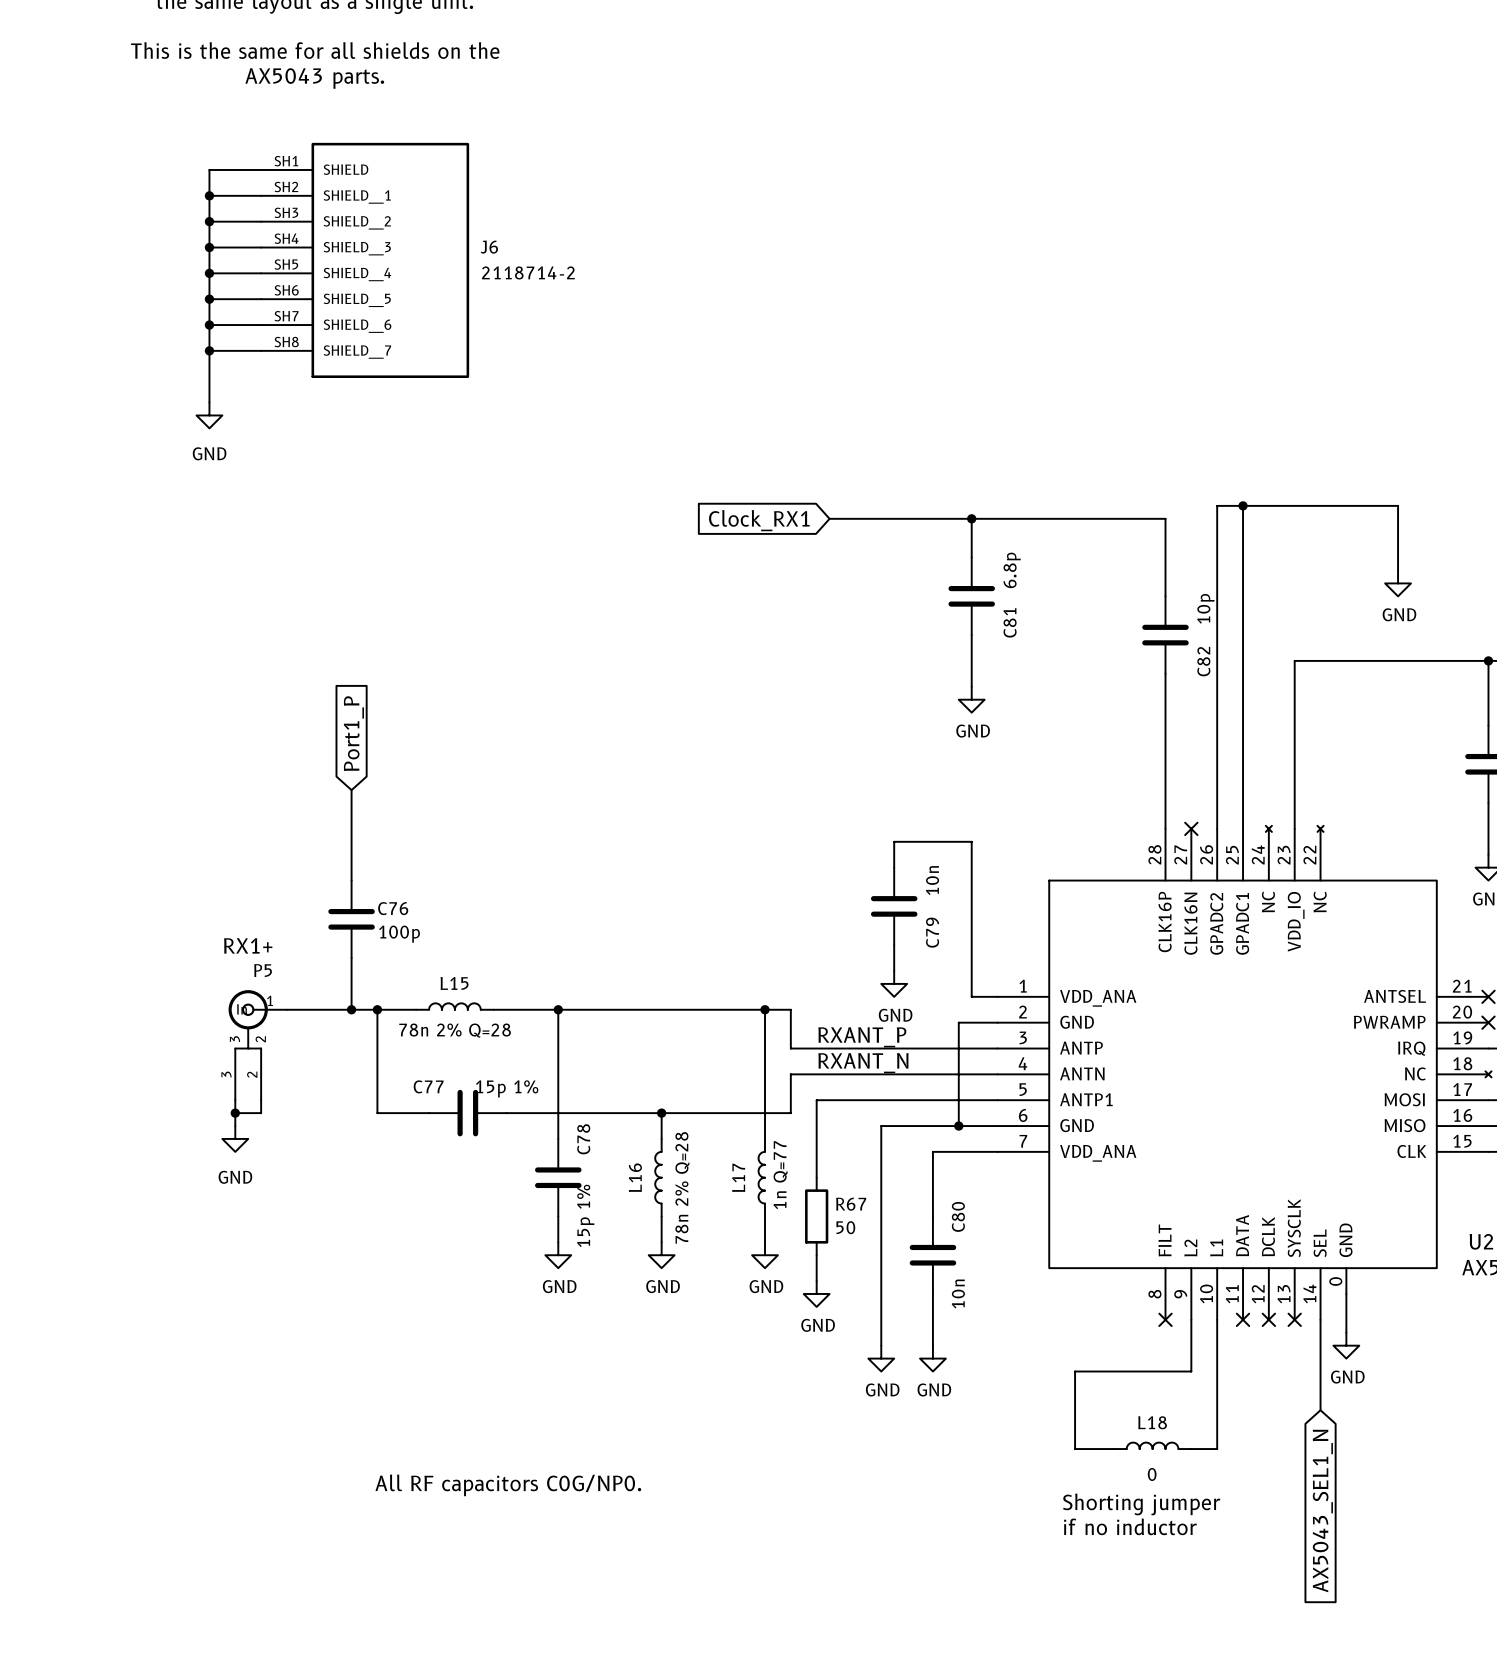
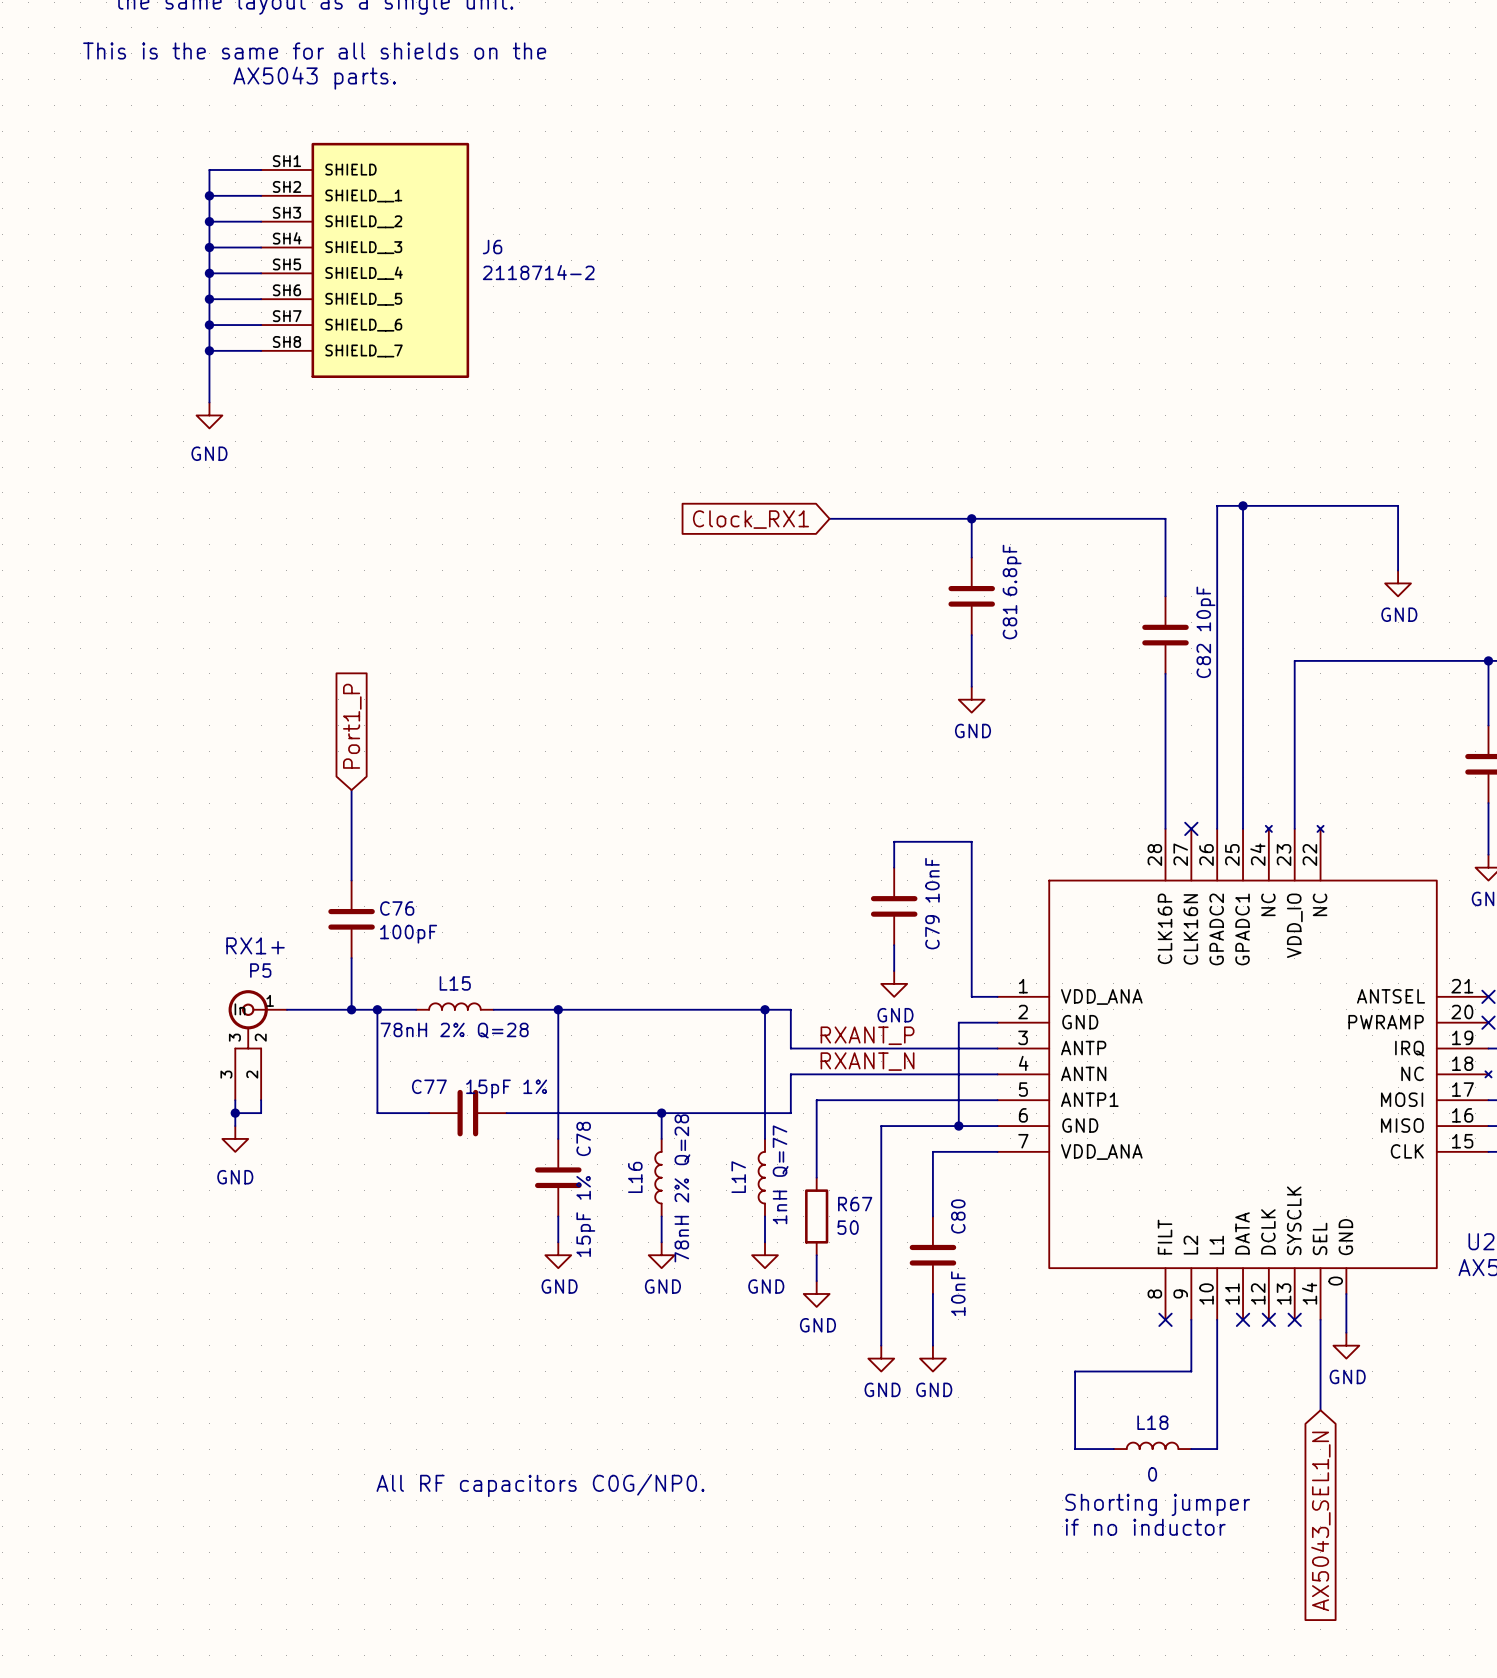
C81 value: 6.8p (1012, 570) -> 6.8pF (1012, 570)
C82 value: 10p (1205, 608) -> 10pF (1205, 608)
C79 value: 10n (932, 880) -> 10nF (932, 880)
C76 value: 100p (399, 934) -> 100pF (408, 934)
L15 value: 78n 2% Q=28 (455, 1030) -> 78nH 2% Q=28 (454, 1030)
C77 value: 15p 1% (507, 1088) -> 15pF 1% (506, 1088)
L17 value: 1n Q=77 (780, 1175) -> 1nH Q=77 (780, 1174)
L16 value: 78n 2% Q=28 (682, 1187) -> 78nH 2% Q=28 (682, 1188)
C78 value: 15p 1% (585, 1215) -> 15pF 1% (585, 1216)
C80 value: 10n (958, 1294) -> 10nF (958, 1293)

